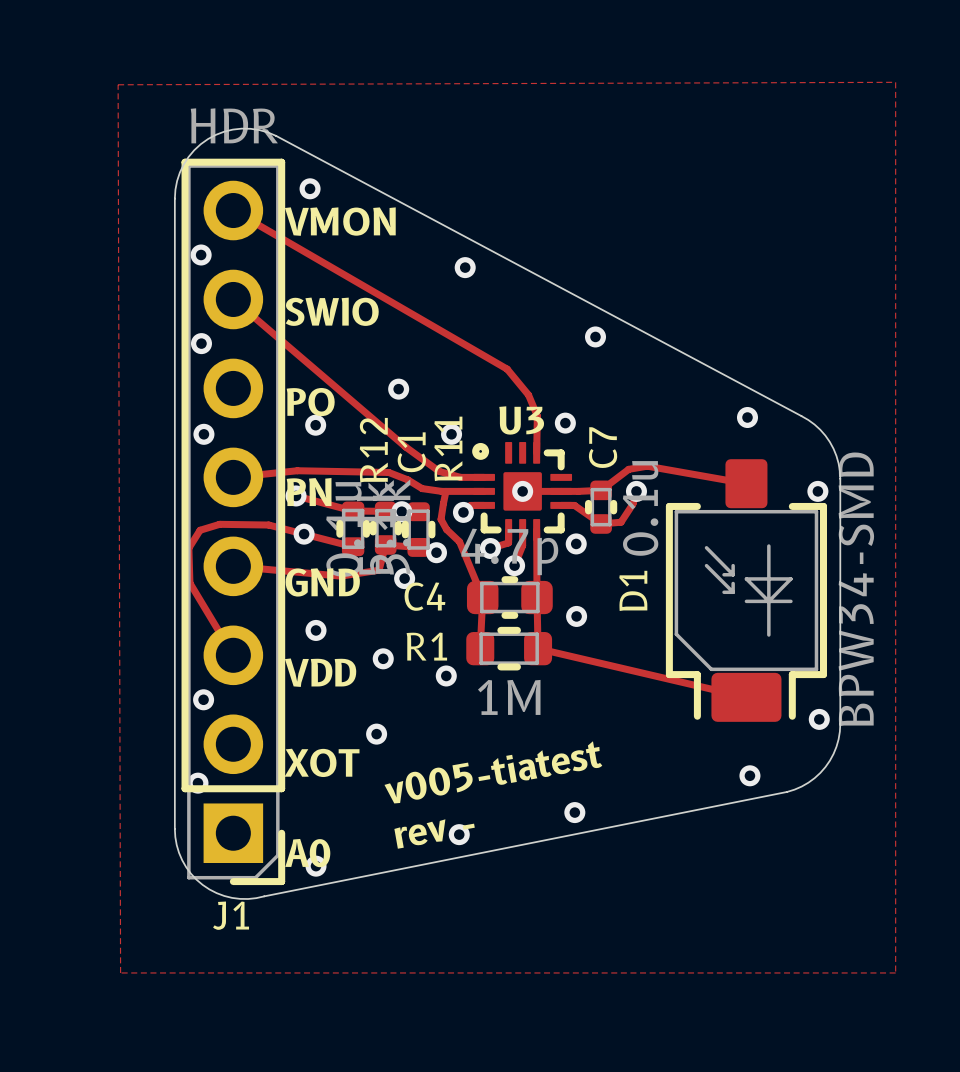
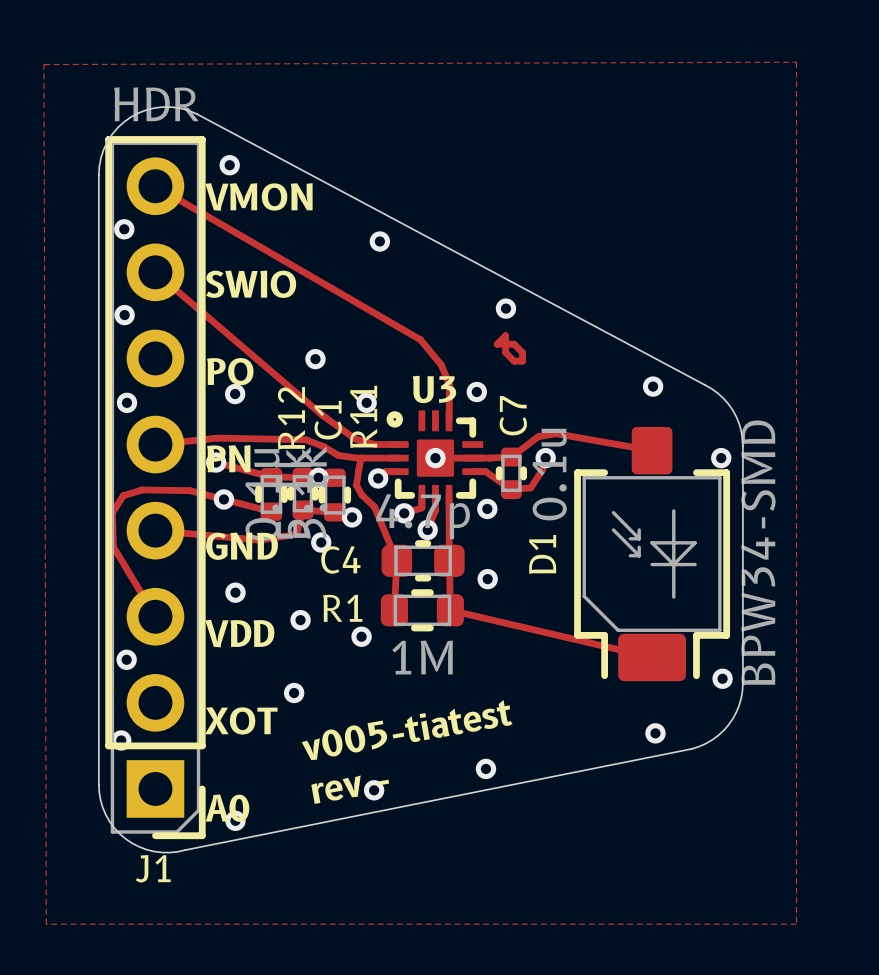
track: none -> (505, 335) (505, 352) (514, 361) (522, 361) (522, 352) (514, 344) (497, 344) (505, 335)

